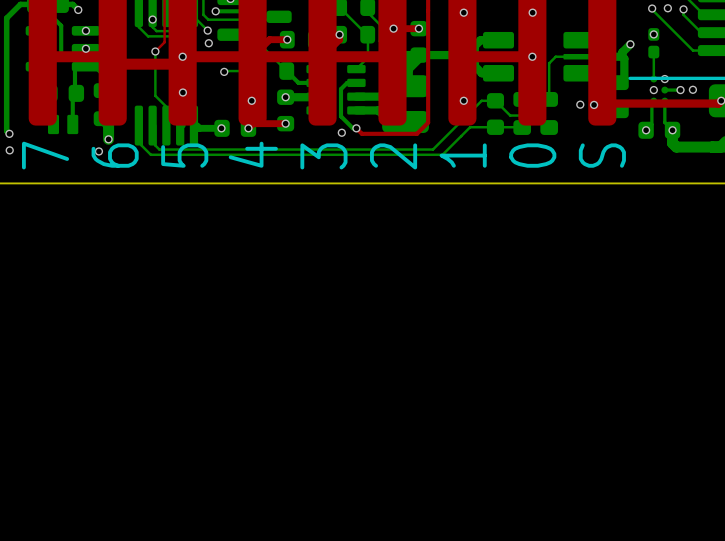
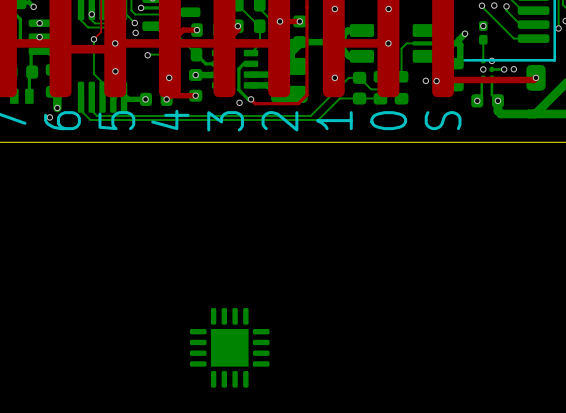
part: none -> (229, 347)

